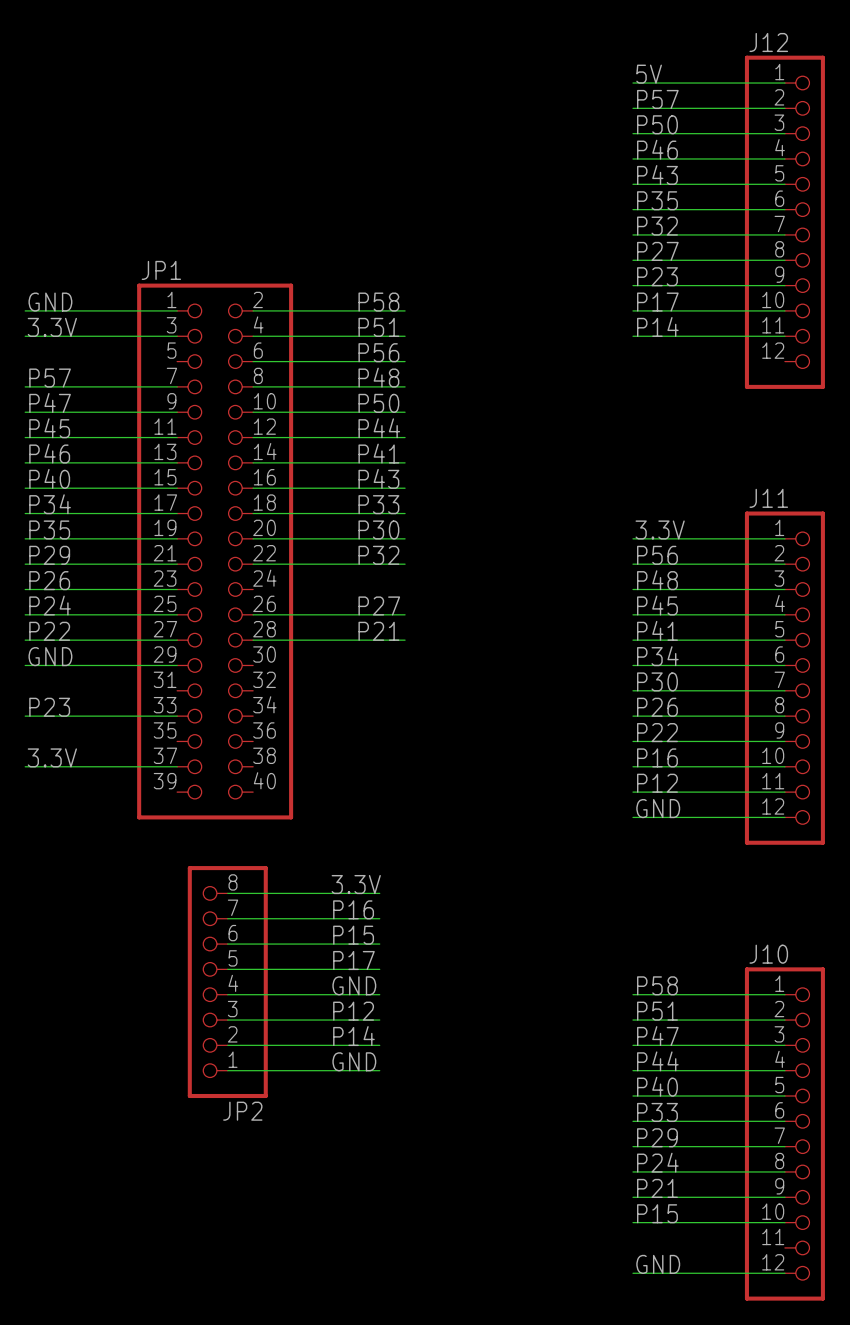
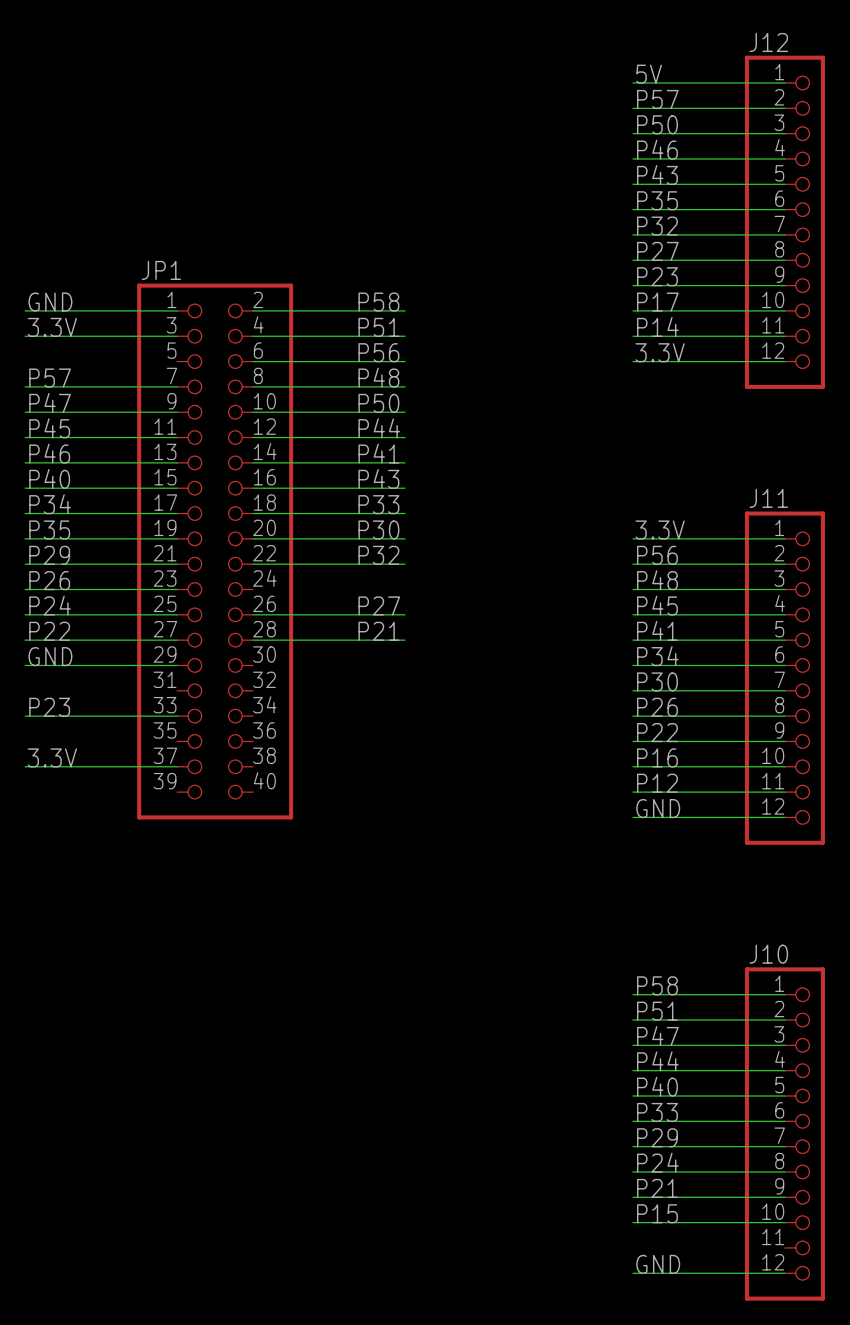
label: none -> 3.3V (660, 352)
wire: none -> (632, 361) (784, 361)
label: 3.3V (356, 884) -> none
wire: (227, 893) (379, 893) -> none
label: P16 (353, 909) -> none
wire: (227, 918) (379, 918) -> none
label: P15 (353, 935) -> none
wire: (227, 944) (379, 944) -> none
label: P17 (353, 960) -> none
wire: (227, 969) (379, 969) -> none
JP2: (227, 982) -> none
label: GND (354, 985) -> none
wire: (227, 994) (379, 994) -> none
label: P12 (353, 1011) -> none
wire: (227, 1020) (379, 1020) -> none
label: P14 (353, 1036) -> none
wire: (227, 1045) (379, 1045) -> none
label: GND (354, 1061) -> none
wire: (227, 1070) (379, 1070) -> none

